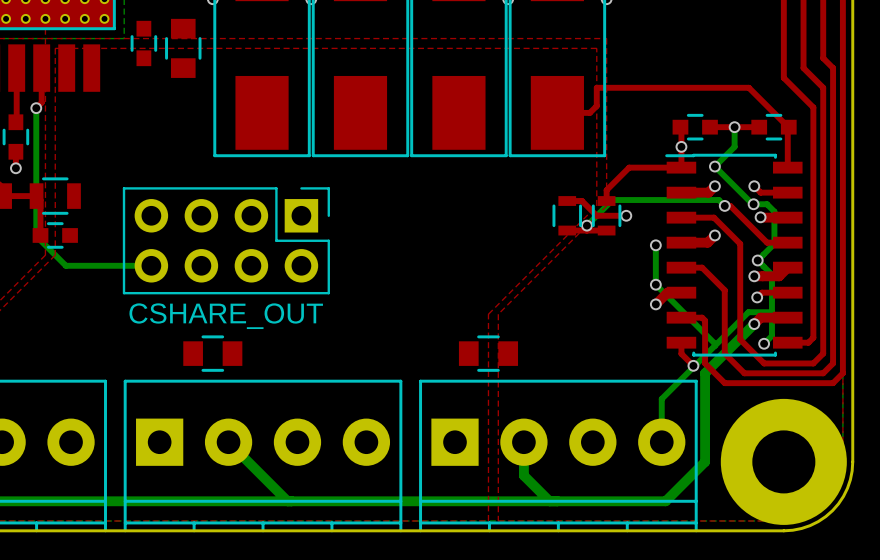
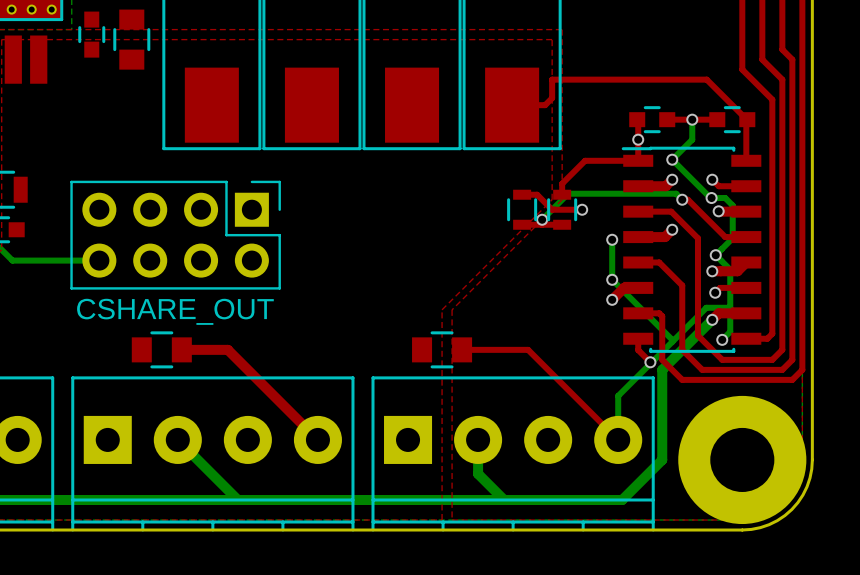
top track: none -> (181, 349) (227, 349) (317, 439)
top track: none -> (462, 349) (528, 349) (618, 439)

